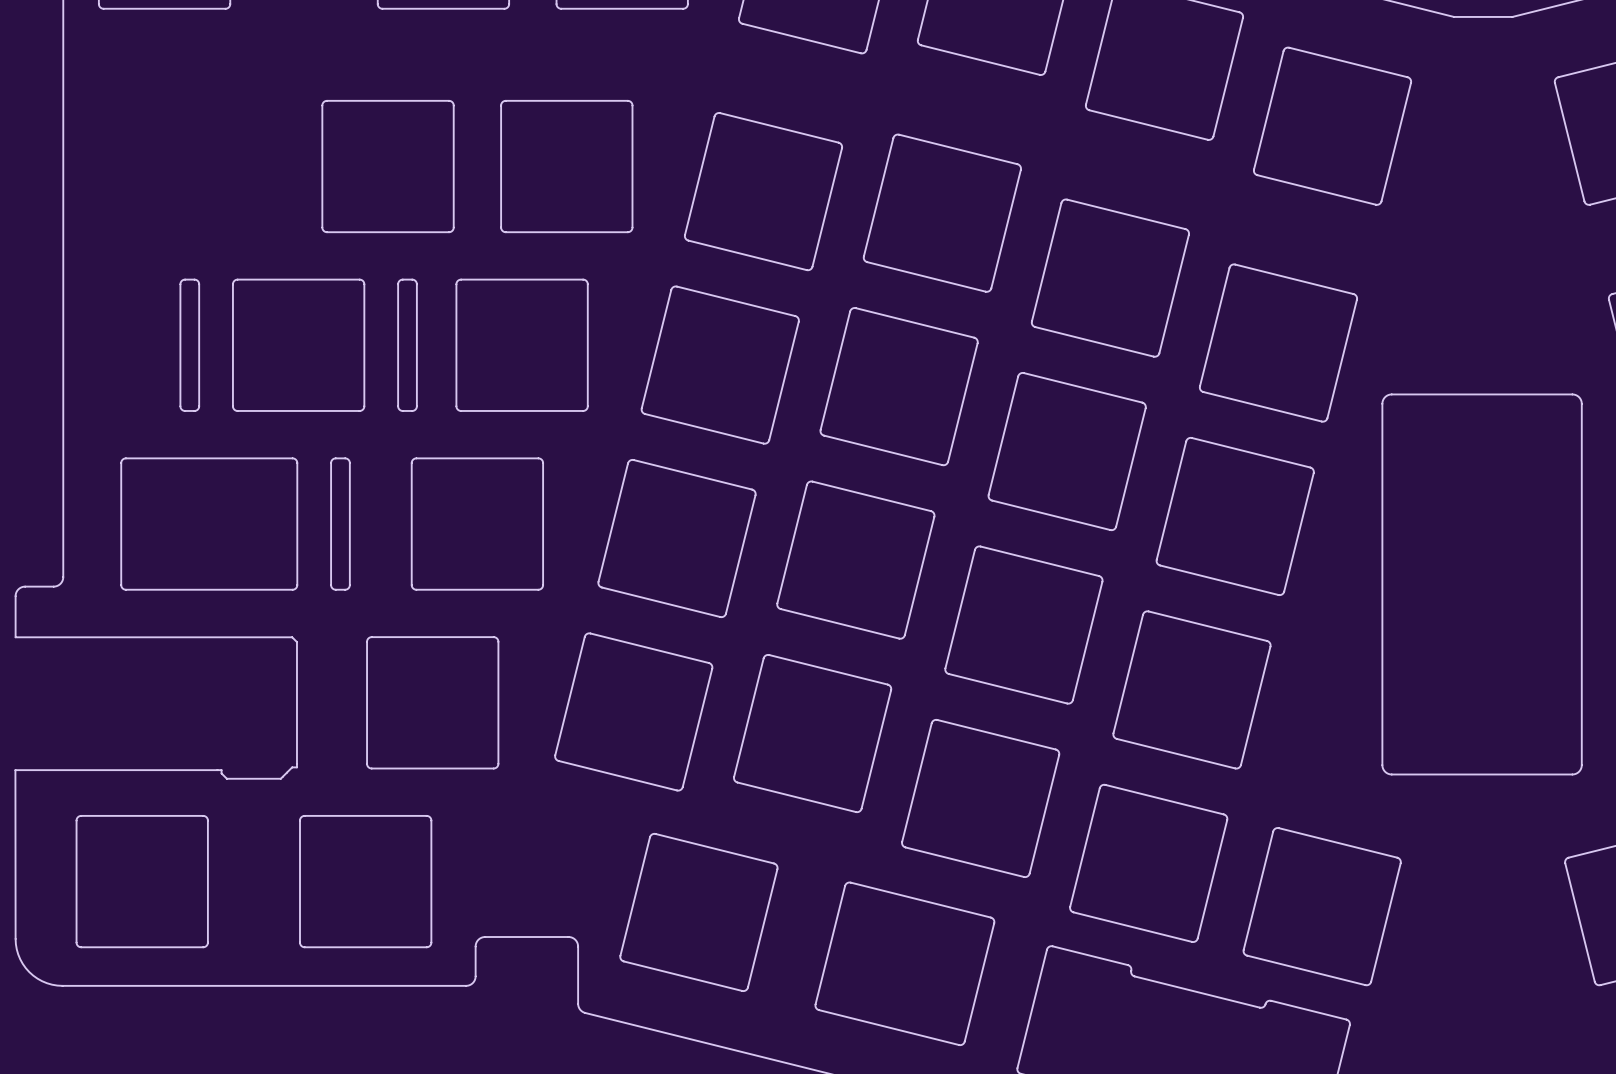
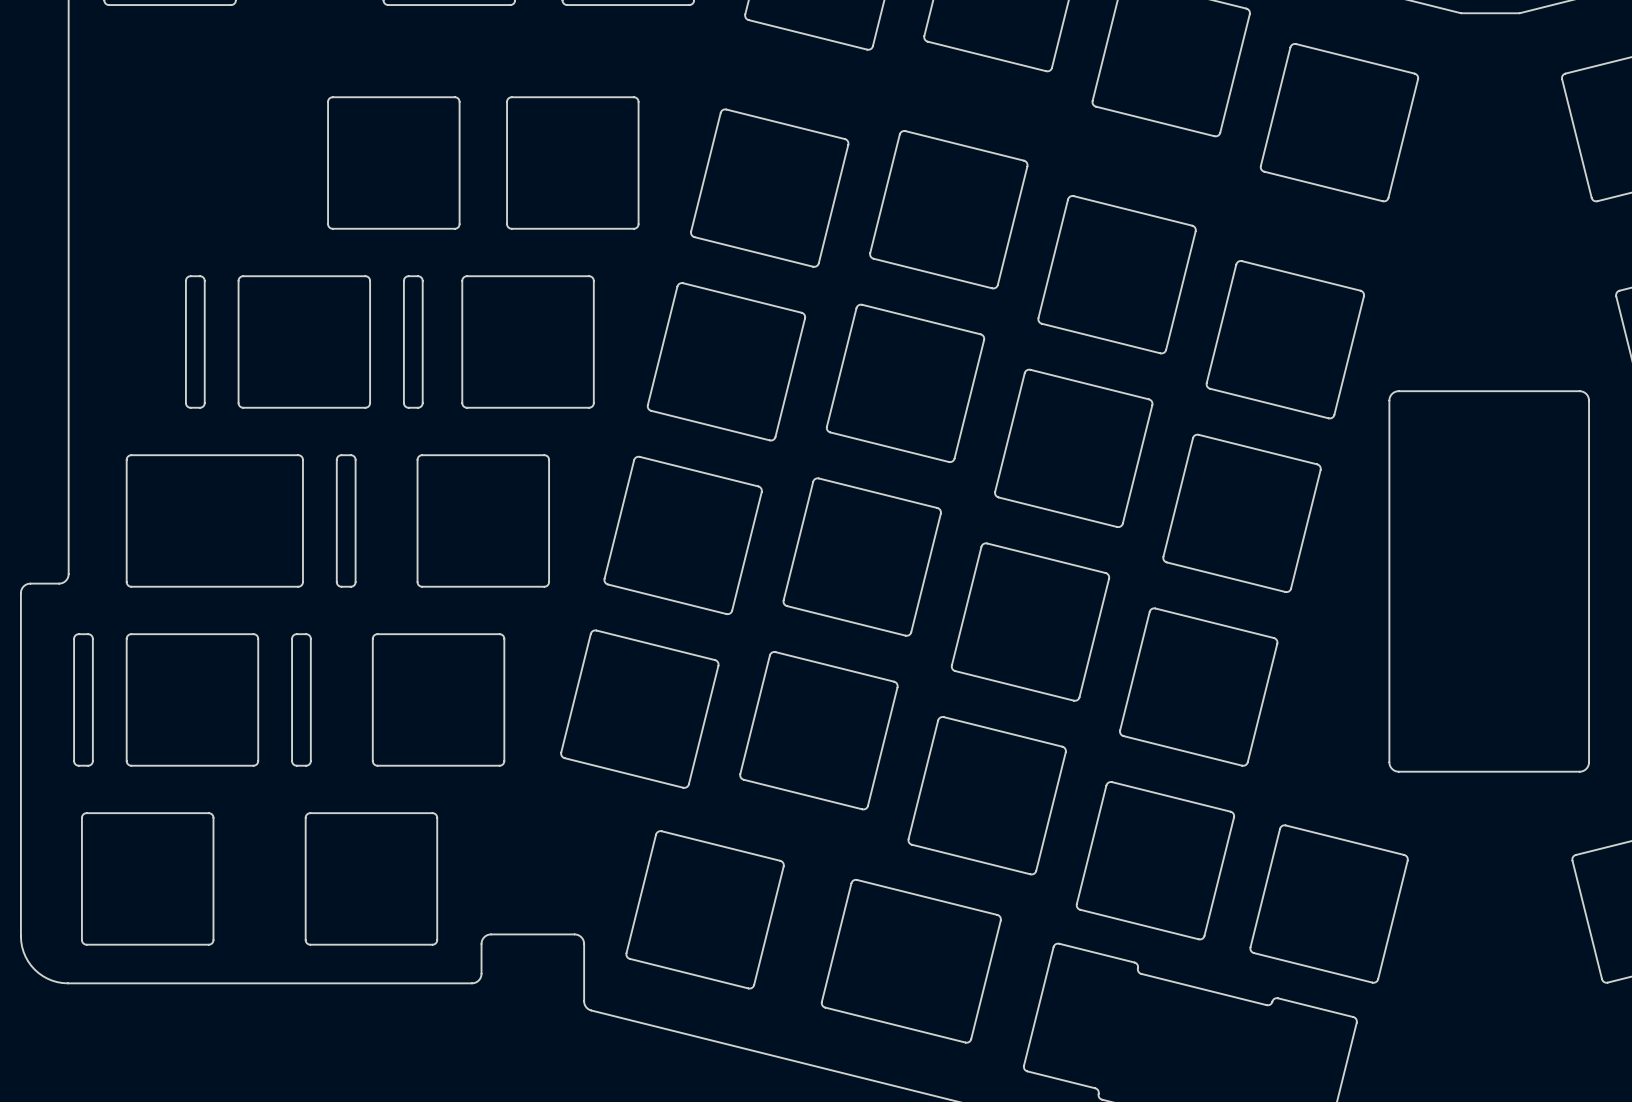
drawing: none -> [73, 633, 312, 767]
board edge: (15, 637) (292, 637) (296, 642) (296, 767) (292, 767) (280, 778) (226, 778) (221, 773) (221, 770) (15, 770) (15, 938) -> (20, 634) (20, 936)

